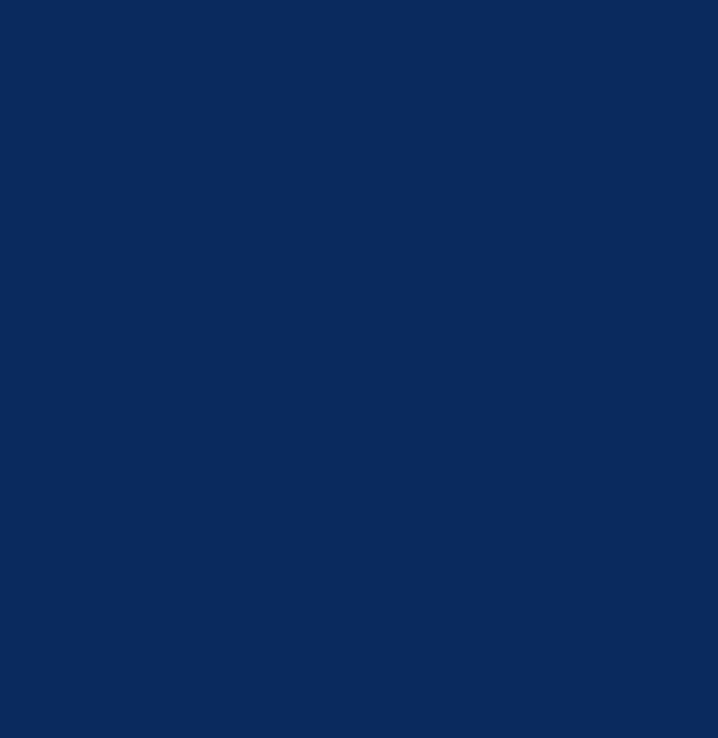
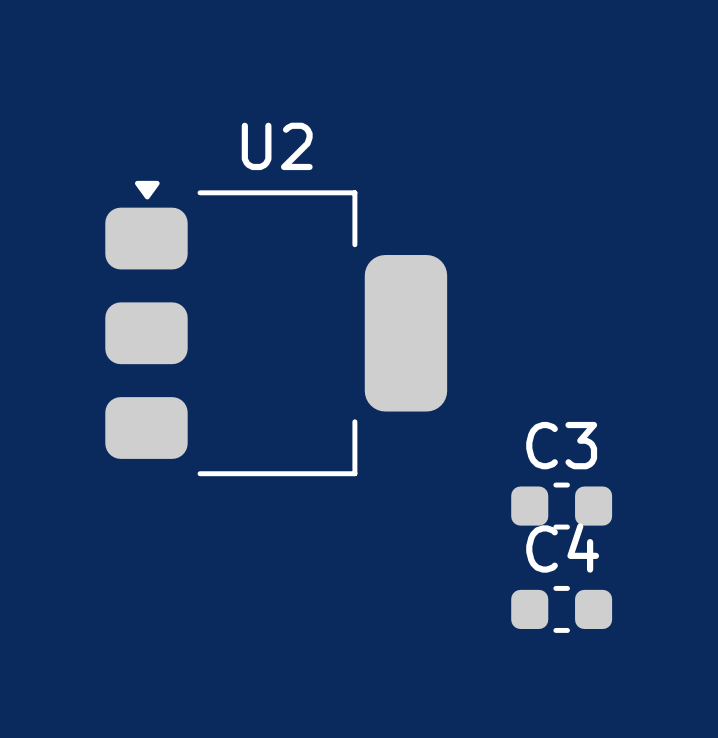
U2: none -> (276, 328)
C3: none -> (561, 506)
C4: none -> (561, 609)

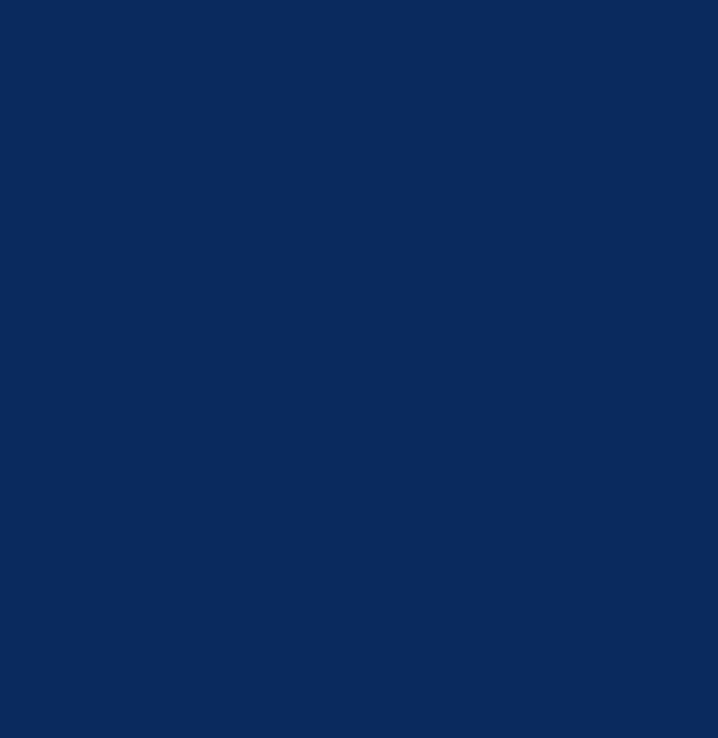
U2: (276, 328) -> none
C3: (561, 506) -> none
C4: (561, 609) -> none

